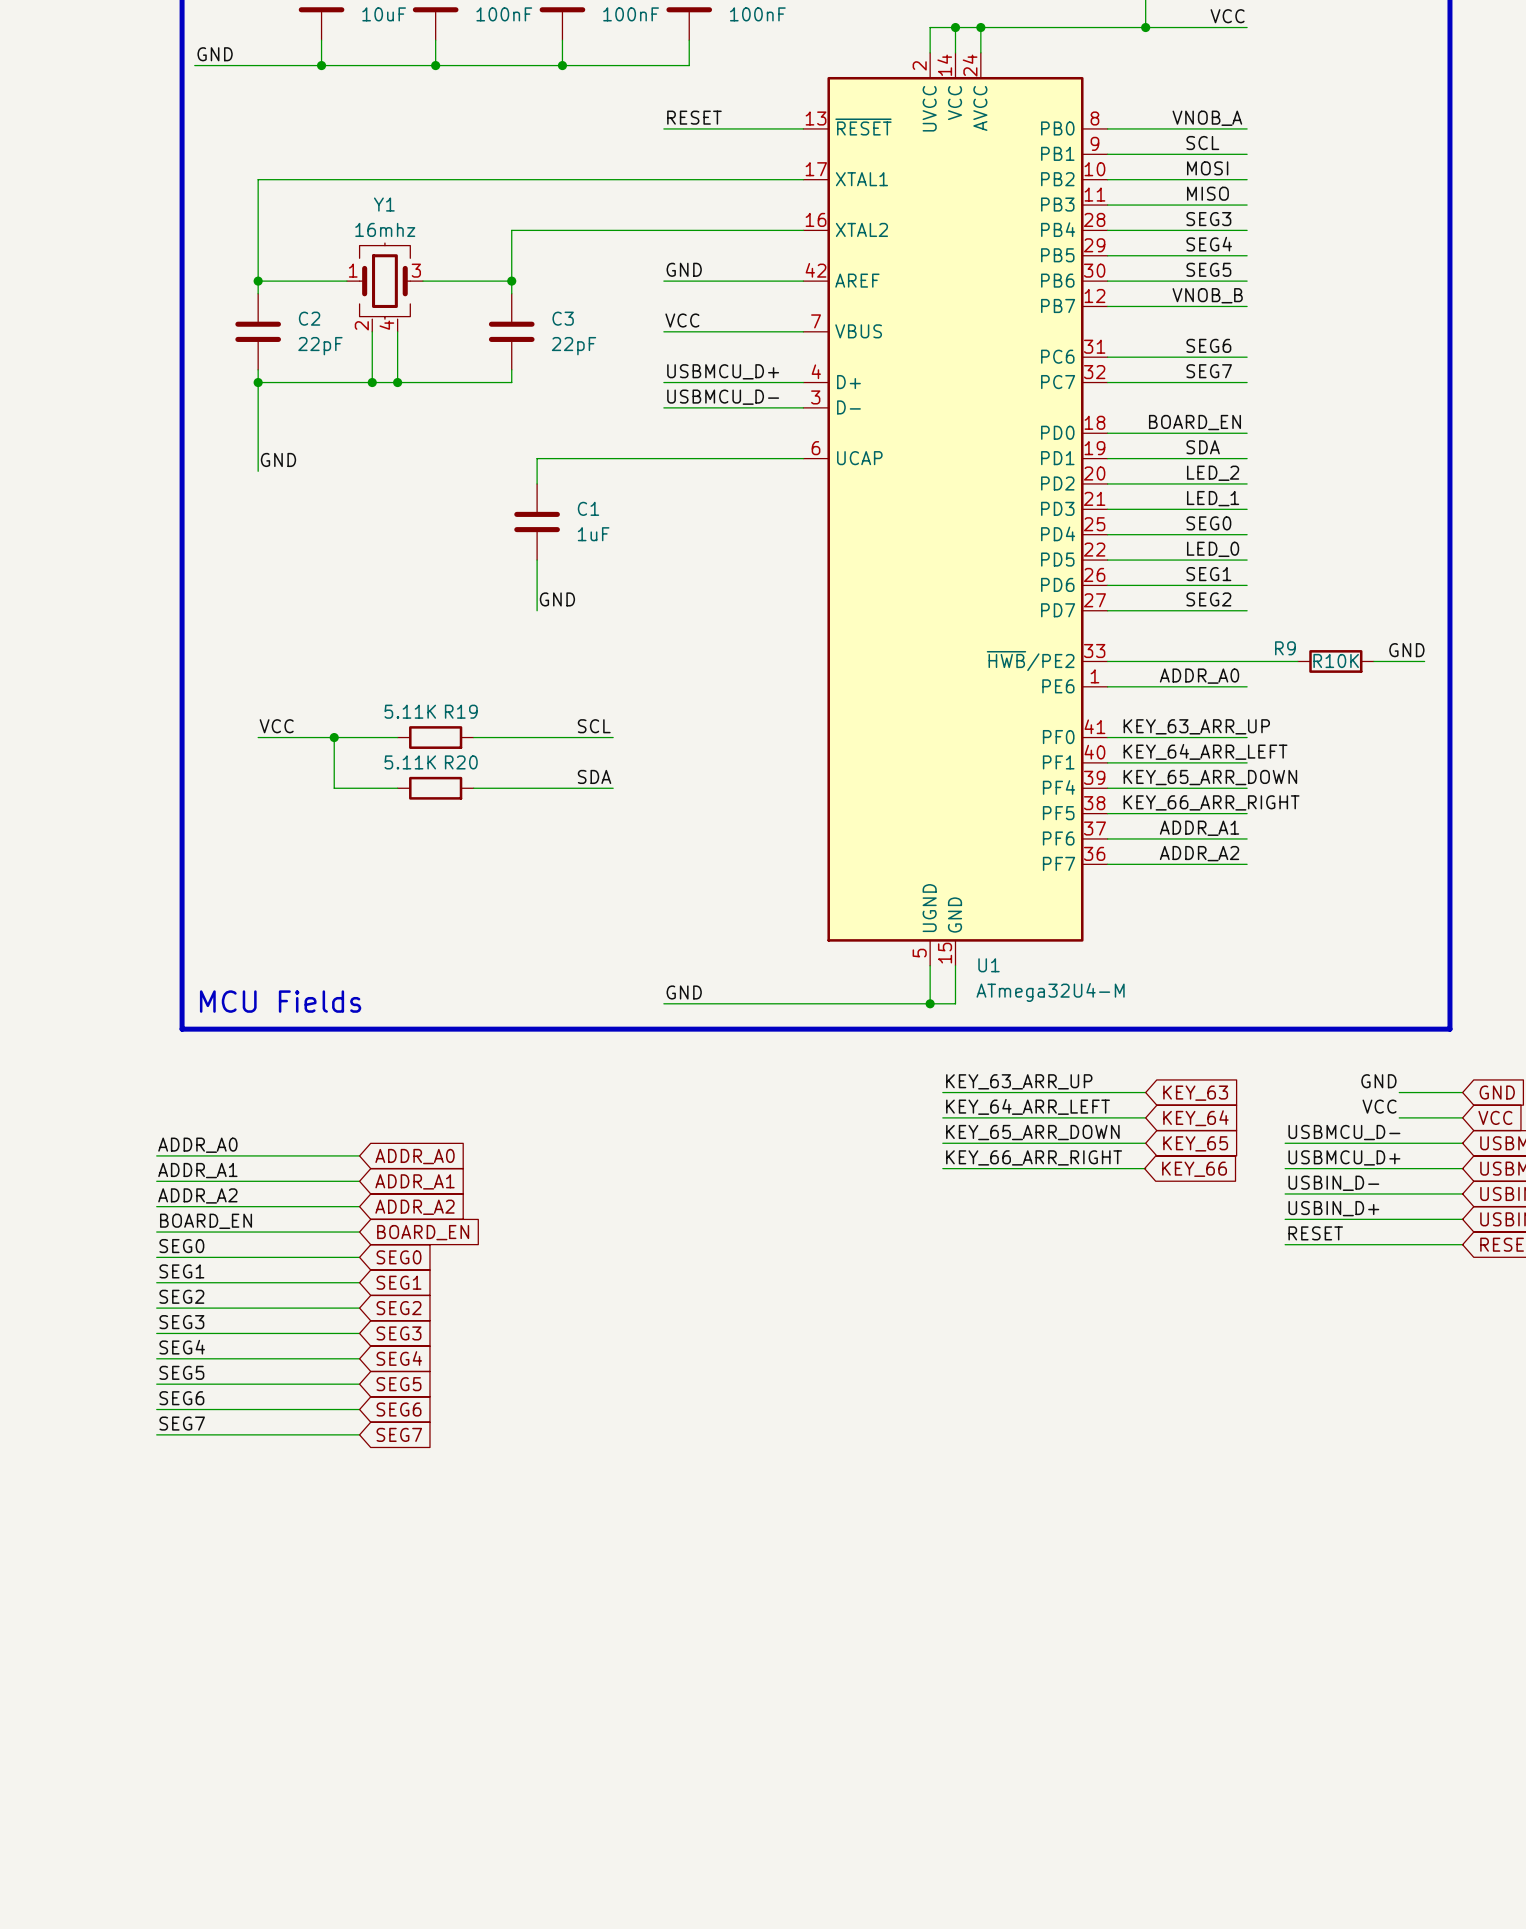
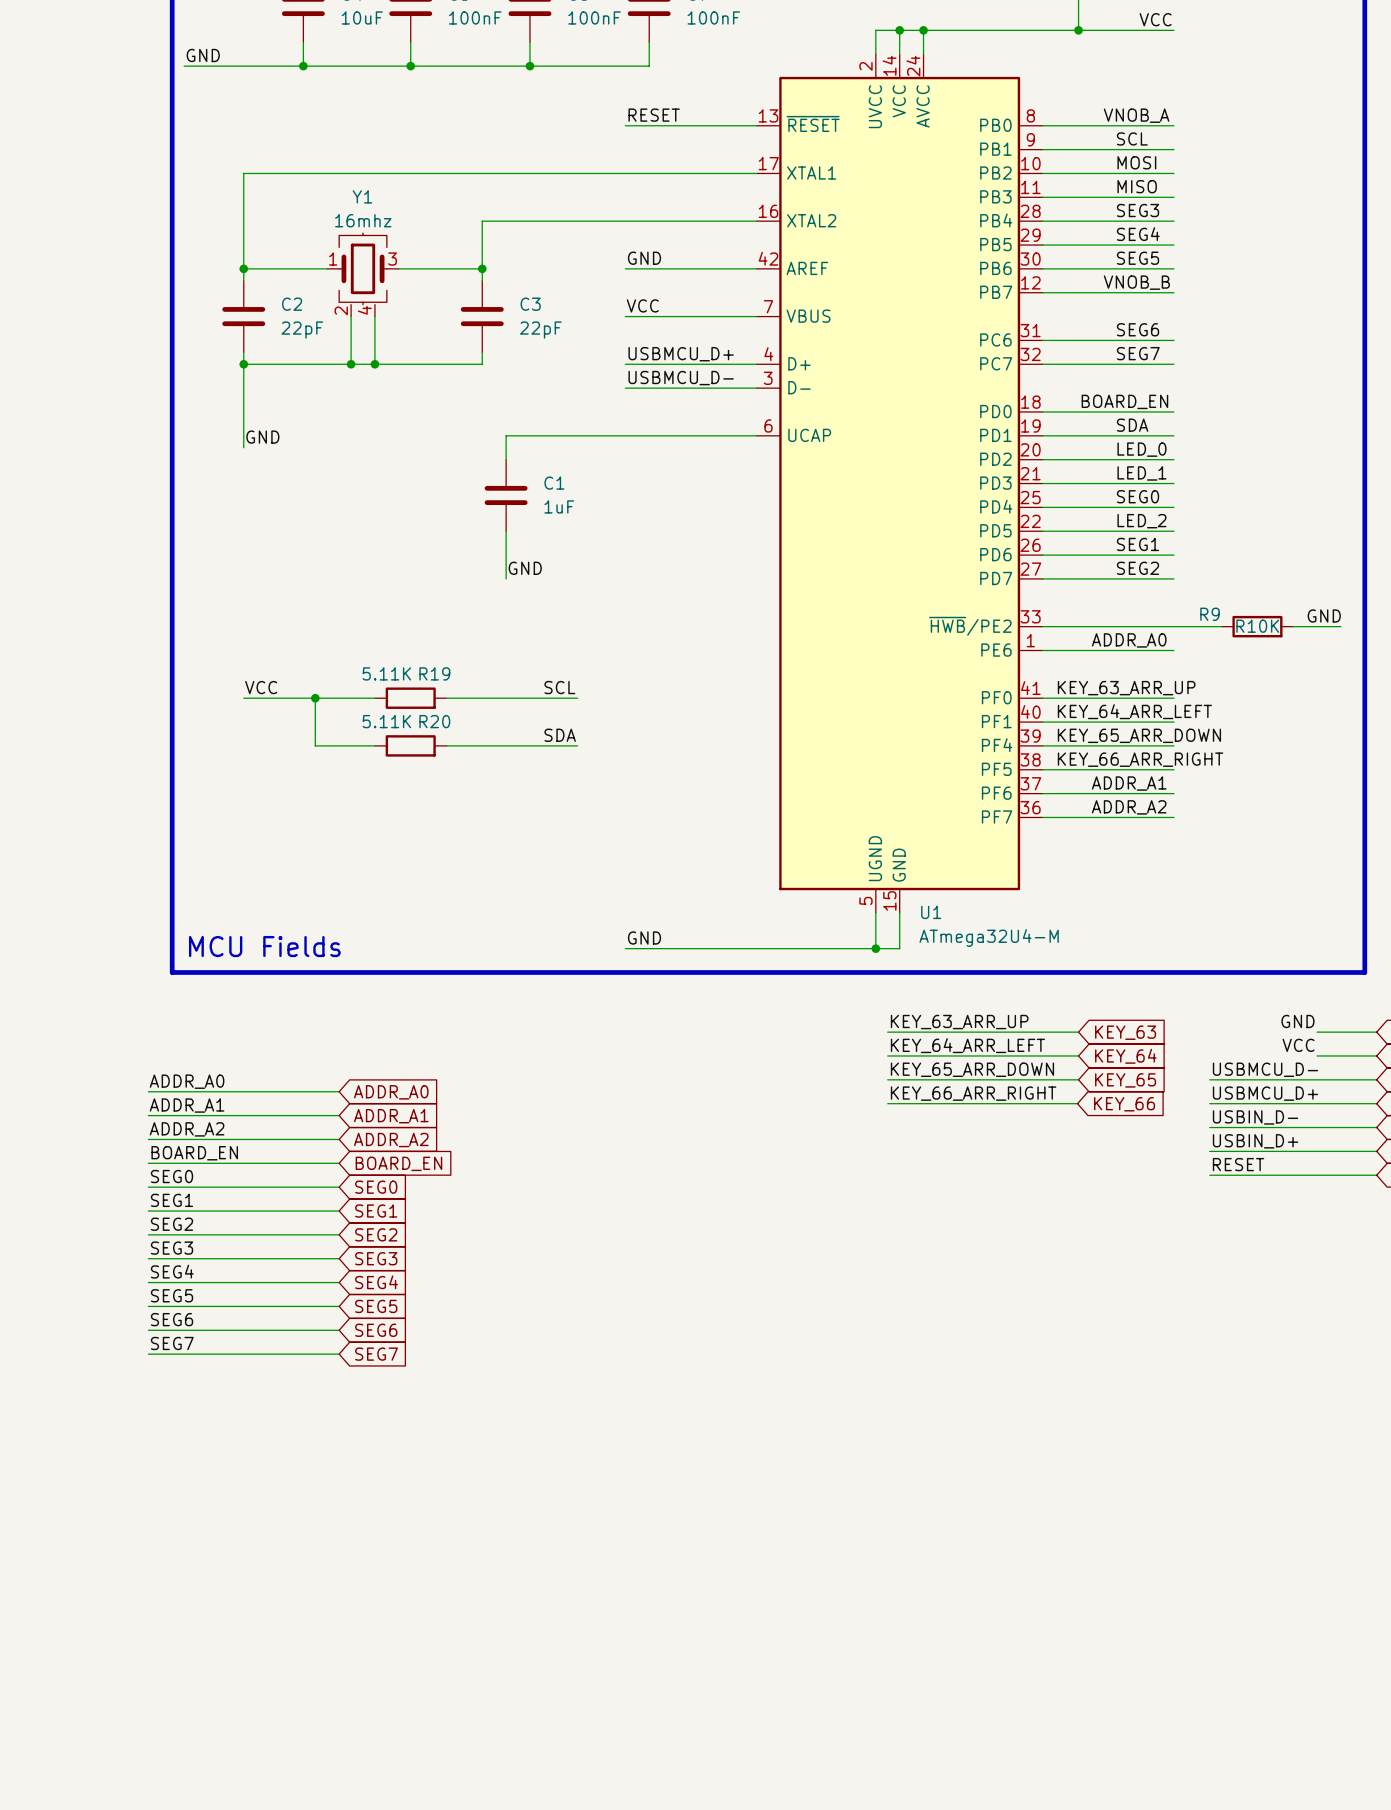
label: LED_2 (1213, 473) -> LED_0 (1141, 449)
label: LED_0 (1213, 549) -> LED_2 (1141, 521)

